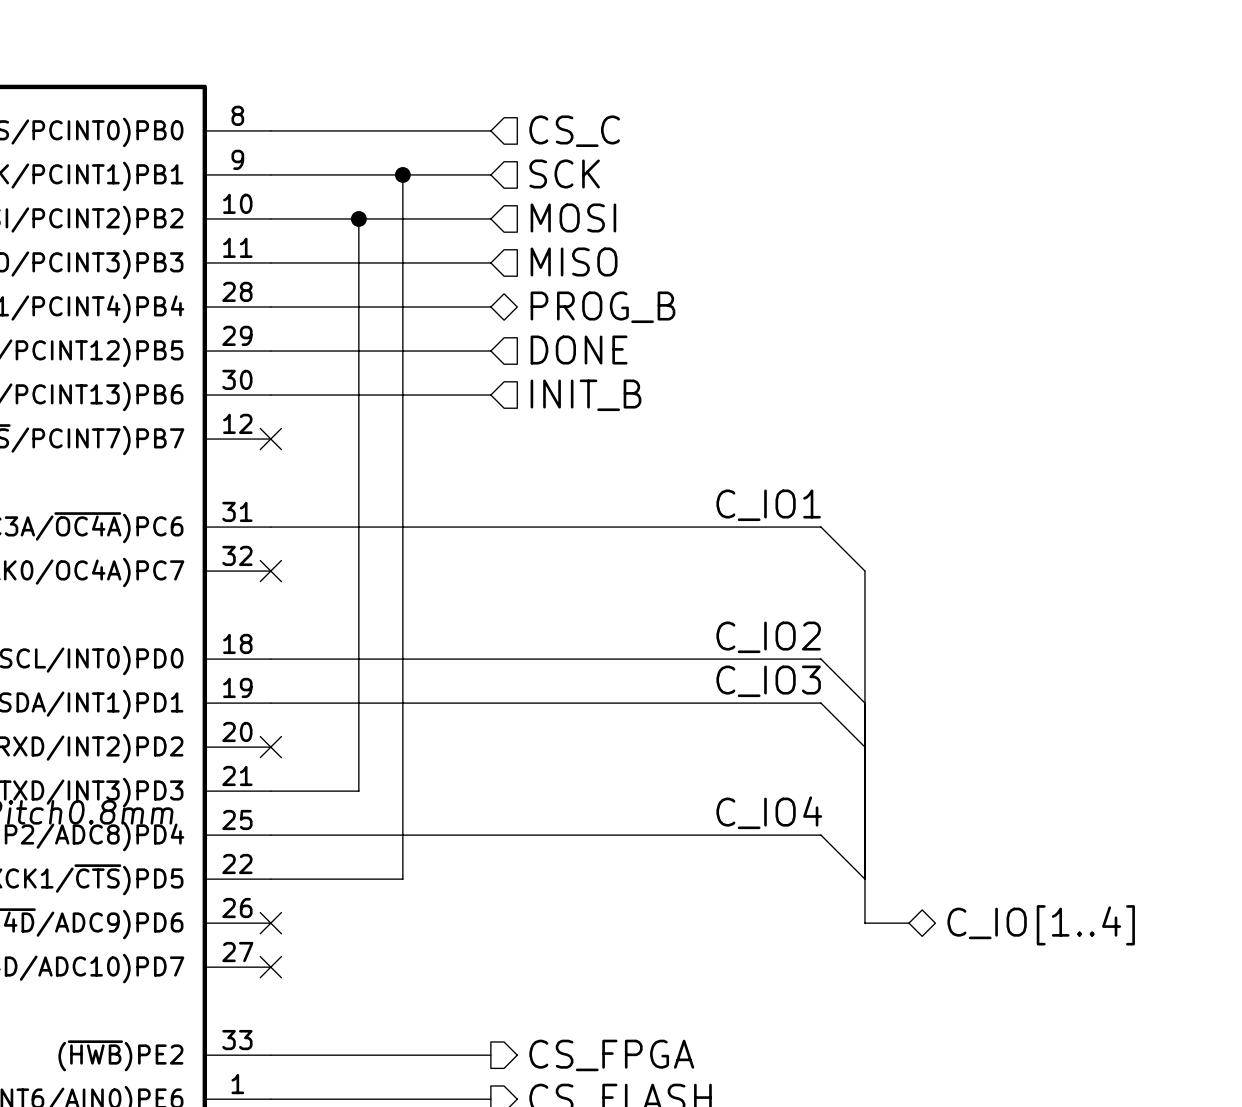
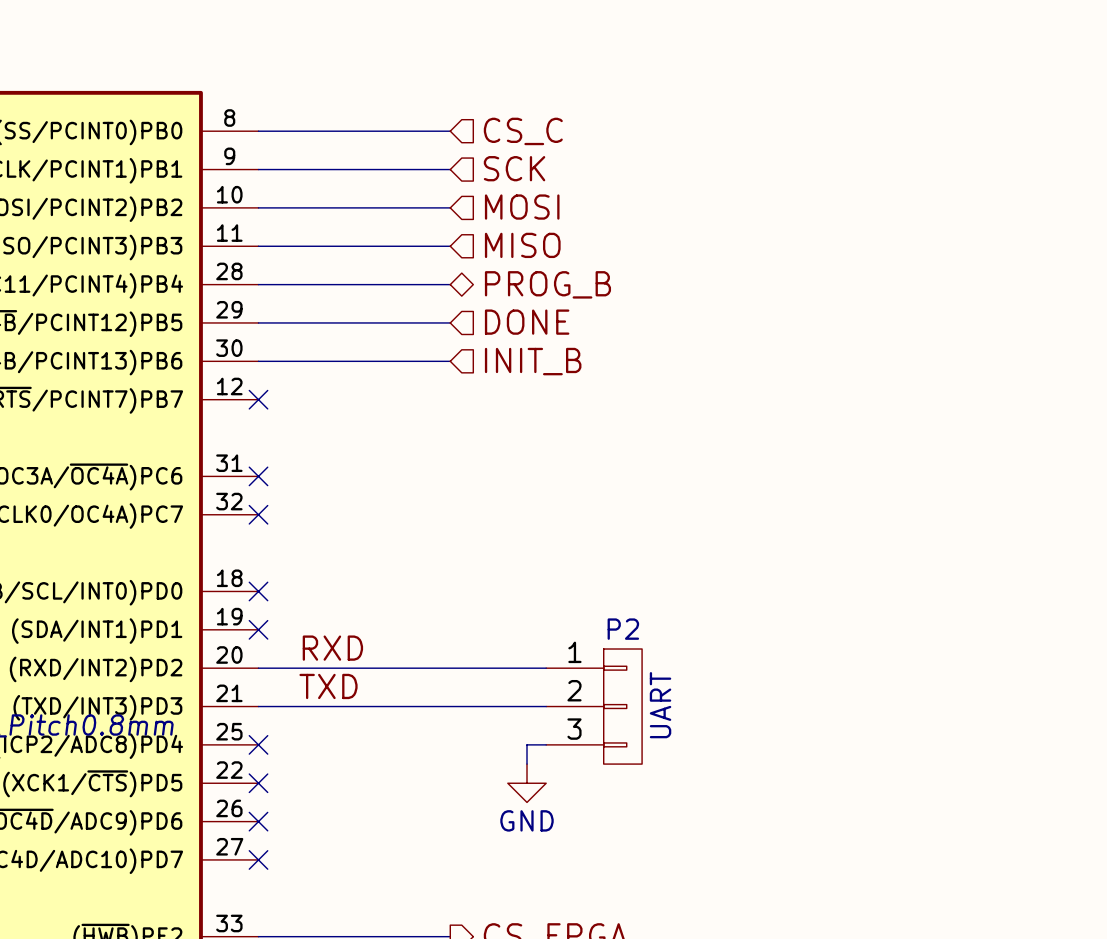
wire: (402, 174) (402, 879) (270, 879) -> none
junction: (402, 174) -> none
wire: (358, 218) (358, 791) -> (546, 706) (335, 706)
junction: (358, 218) -> none
label: C_IO1 (768, 505) -> none
wire: (270, 527) (820, 527) (864, 571) -> none
no-connect mark: none -> (258, 476)
bus: (864, 571) (864, 923) (908, 923) -> none
label: C_IO2 (768, 637) -> none
wire: (270, 659) (820, 659) (864, 703) -> none
no-connect mark: none -> (258, 591)
label: C_IO3 (768, 681) -> none
wire: (270, 703) (820, 703) (864, 747) -> none
no-connect mark: none -> (258, 629)
label: none -> RXD (332, 648)
wire: none -> (258, 668) (546, 668)
no-connect mark: (270, 747) -> none
label: none -> TXD (328, 686)
P2: none -> UART (594, 706)
label: C_IO4 (769, 812) -> none
wire: (270, 835) (578, 835) -> (527, 764) (527, 744)
no-connect mark: none -> (258, 744)
wire: (600, 835) (820, 835) (864, 879) -> none
no-connect mark: none -> (258, 783)
power symbol: none -> GND (527, 783)
hierarchical label: C_IO[1..4] (1041, 925) -> none

